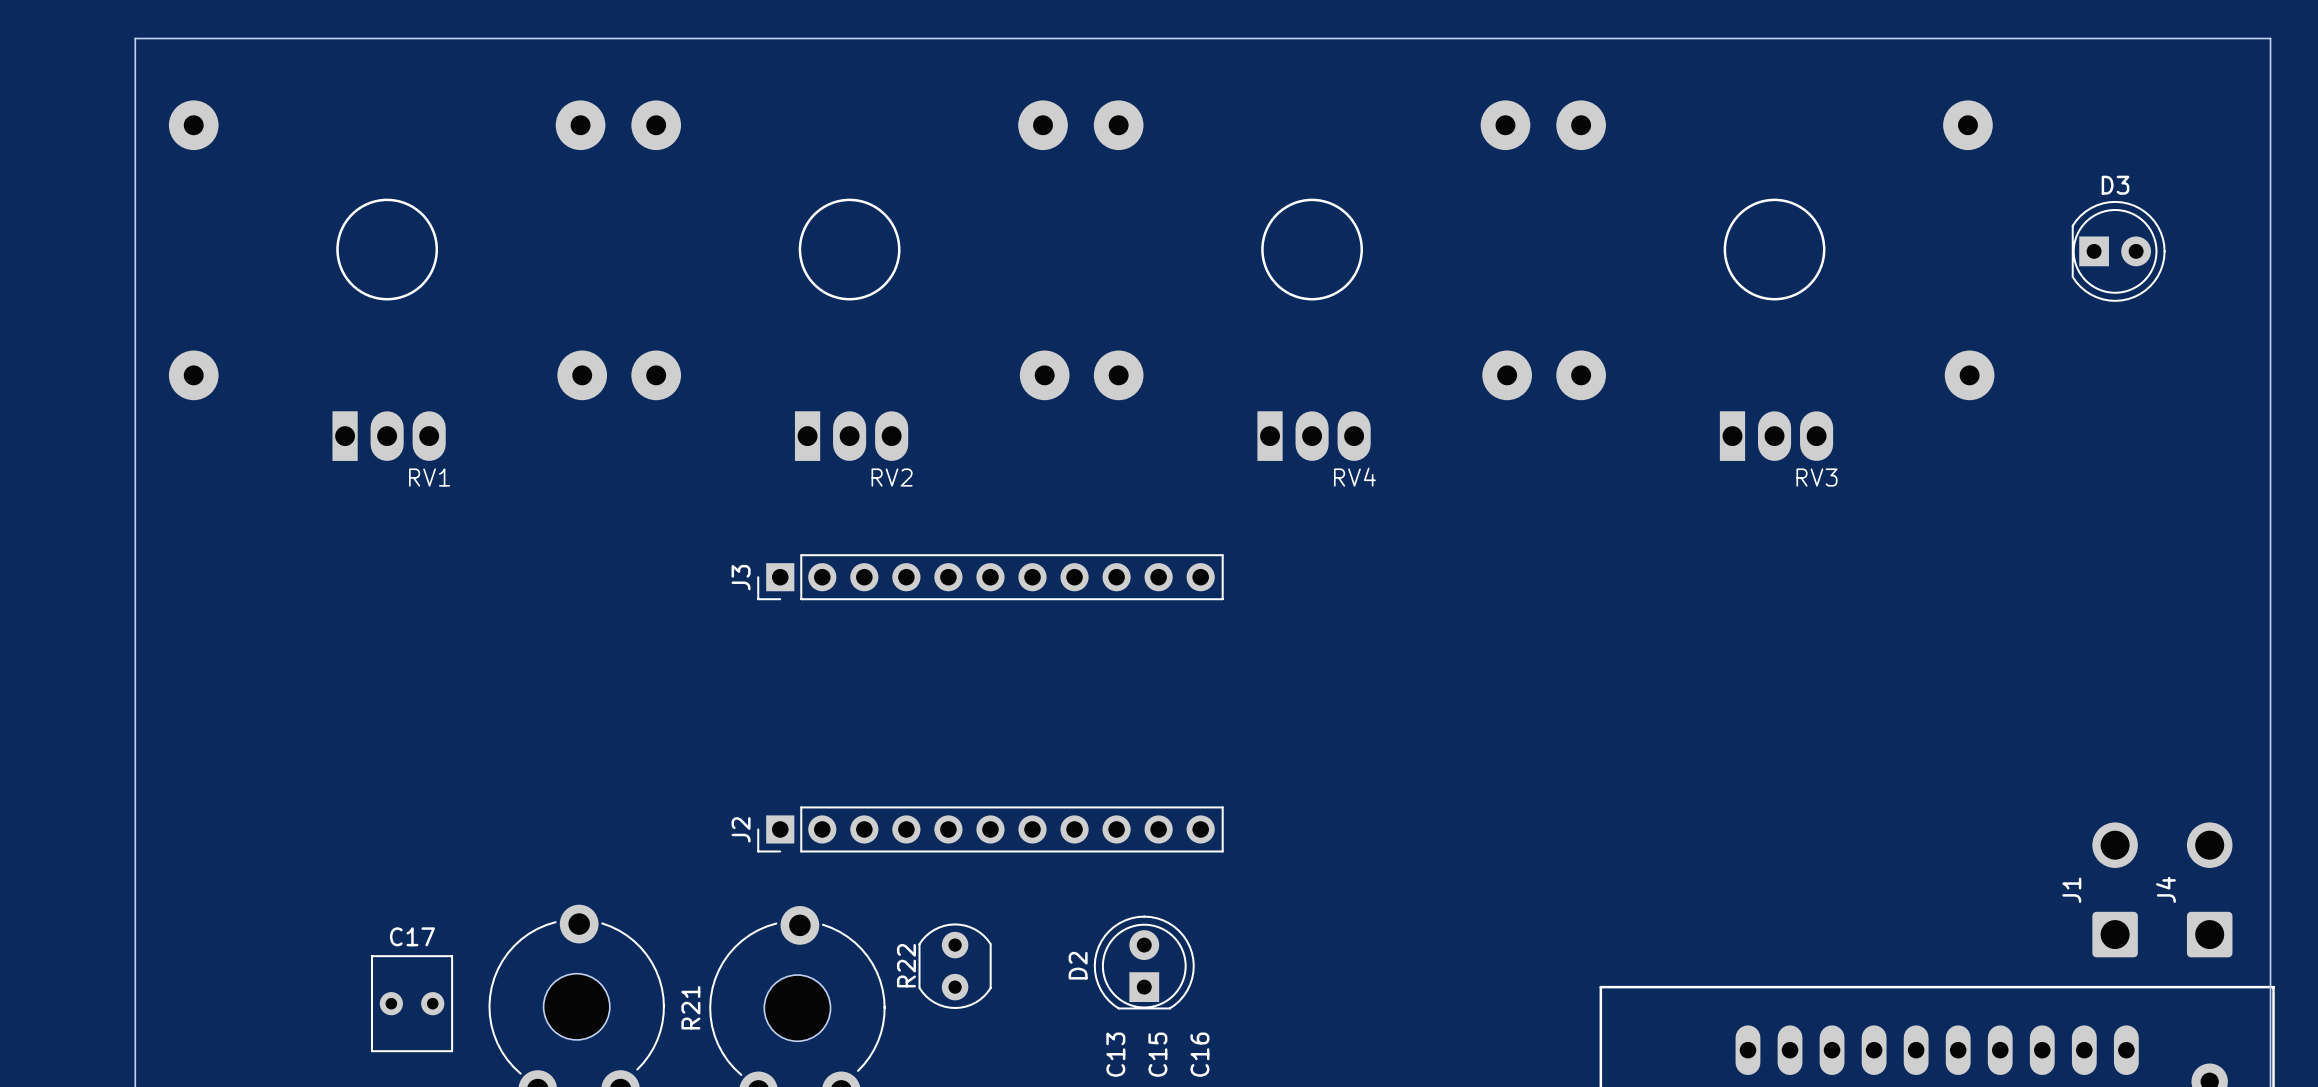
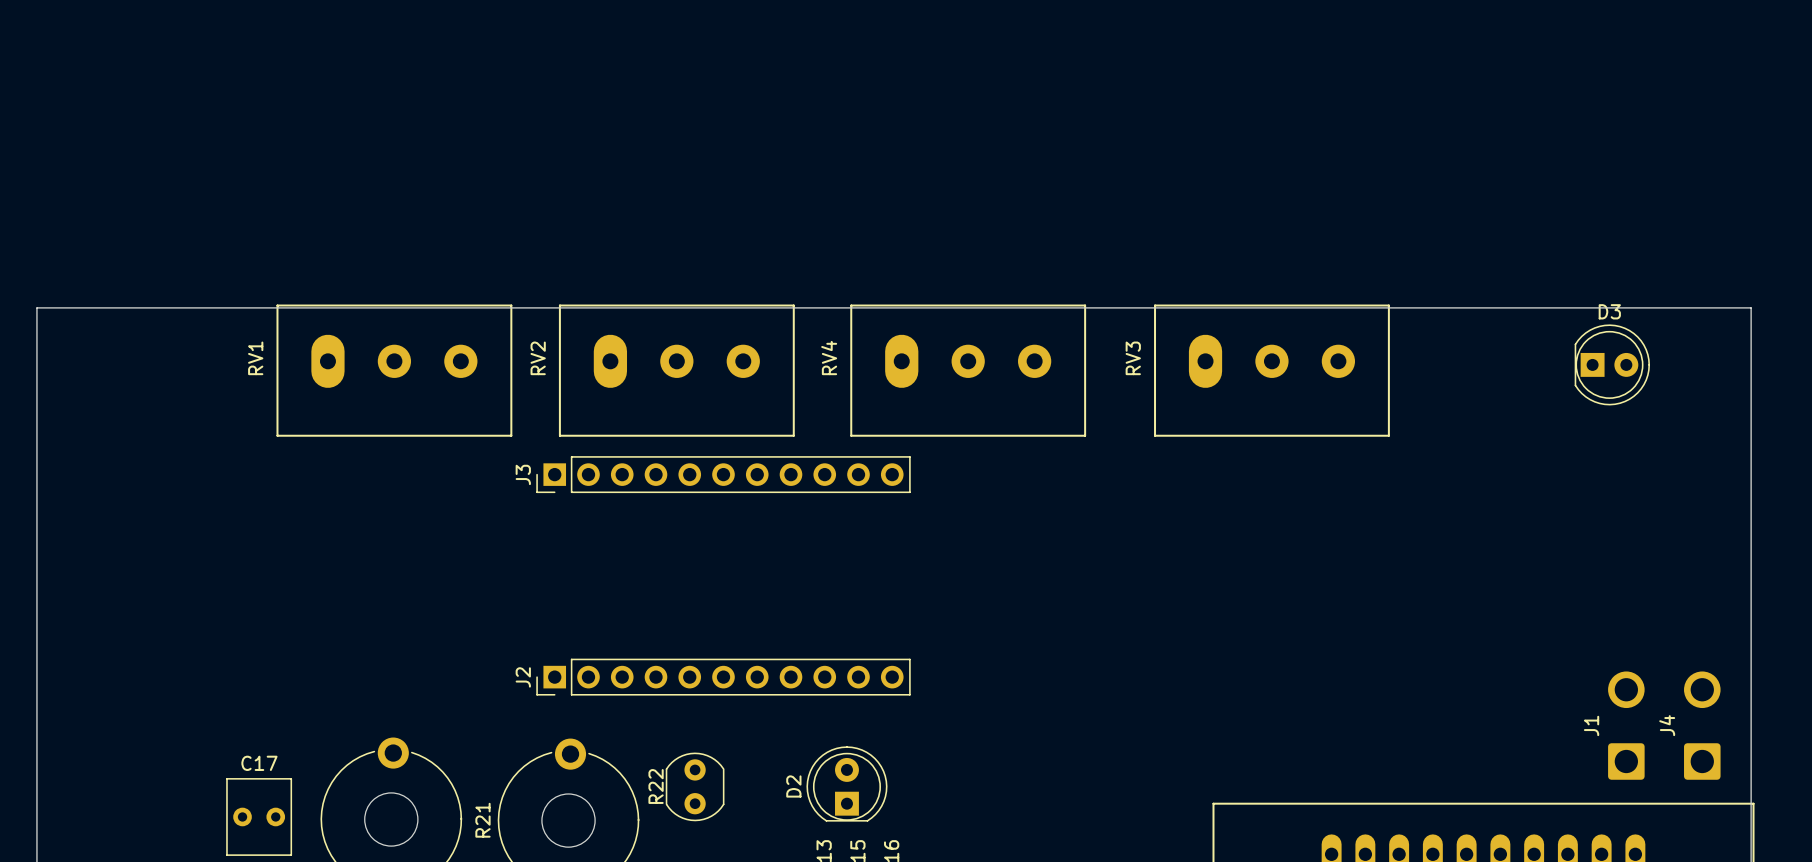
RV1 footprint: [168, 100, 608, 461] -> [276, 304, 513, 437]
RV2 footprint: [631, 100, 1070, 461] -> [558, 304, 795, 437]
RV4 footprint: [1093, 100, 1532, 461] -> [850, 304, 1087, 437]
RV3 footprint: [1556, 100, 1995, 461] -> [1154, 304, 1390, 437]
D3 position: (2118, 251) -> (1612, 364)
board edge: (135, 369) (135, 38) (2270, 38) (2270, 369) -> (36, 307) (1751, 307)
RV1 name position: RV1 (429, 477) -> RV1 (255, 358)
RV2 name position: RV2 (892, 477) -> RV2 (538, 358)
RV4 name position: RV4 (1354, 477) -> RV4 (829, 358)
RV3 name position: RV3 (1816, 477) -> RV3 (1133, 358)

